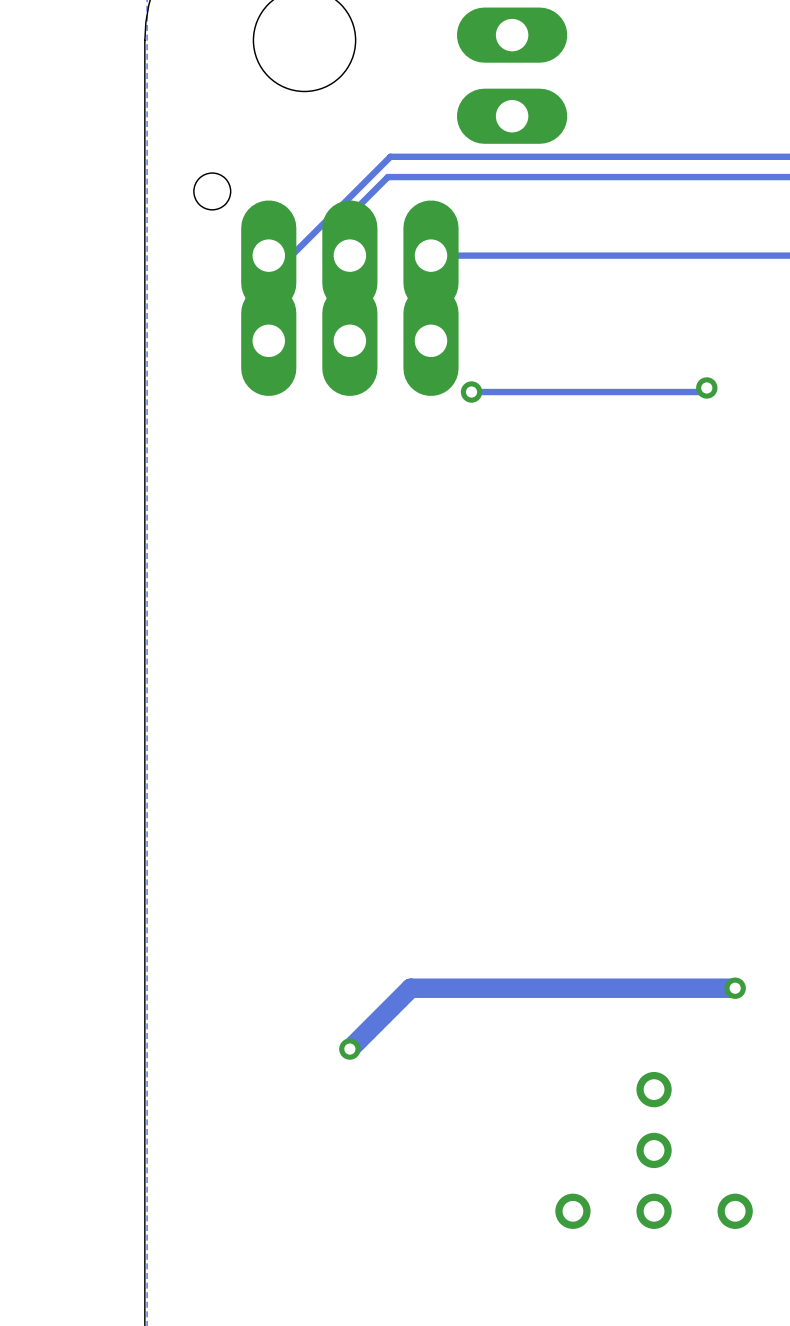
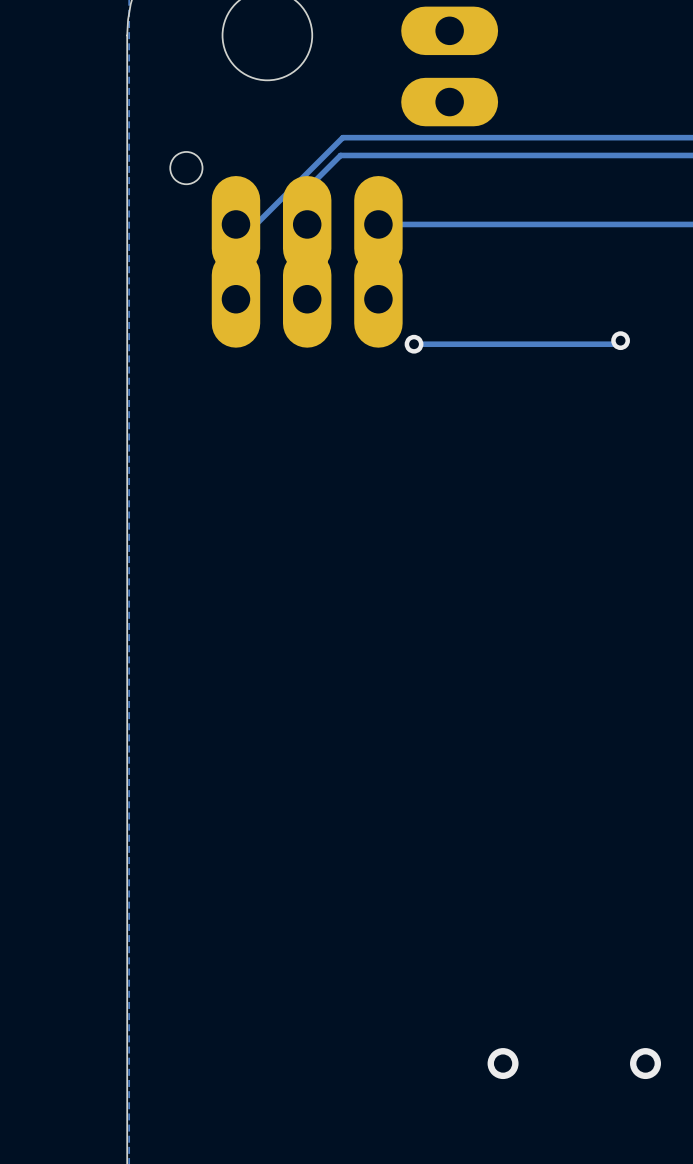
track: (735, 988) (410, 988) (349, 1049) -> none
via: (735, 988) -> none
via: (349, 1049) -> none
via: (654, 1089) -> none
via: (654, 1150) -> none
via: (654, 1211) -> none

